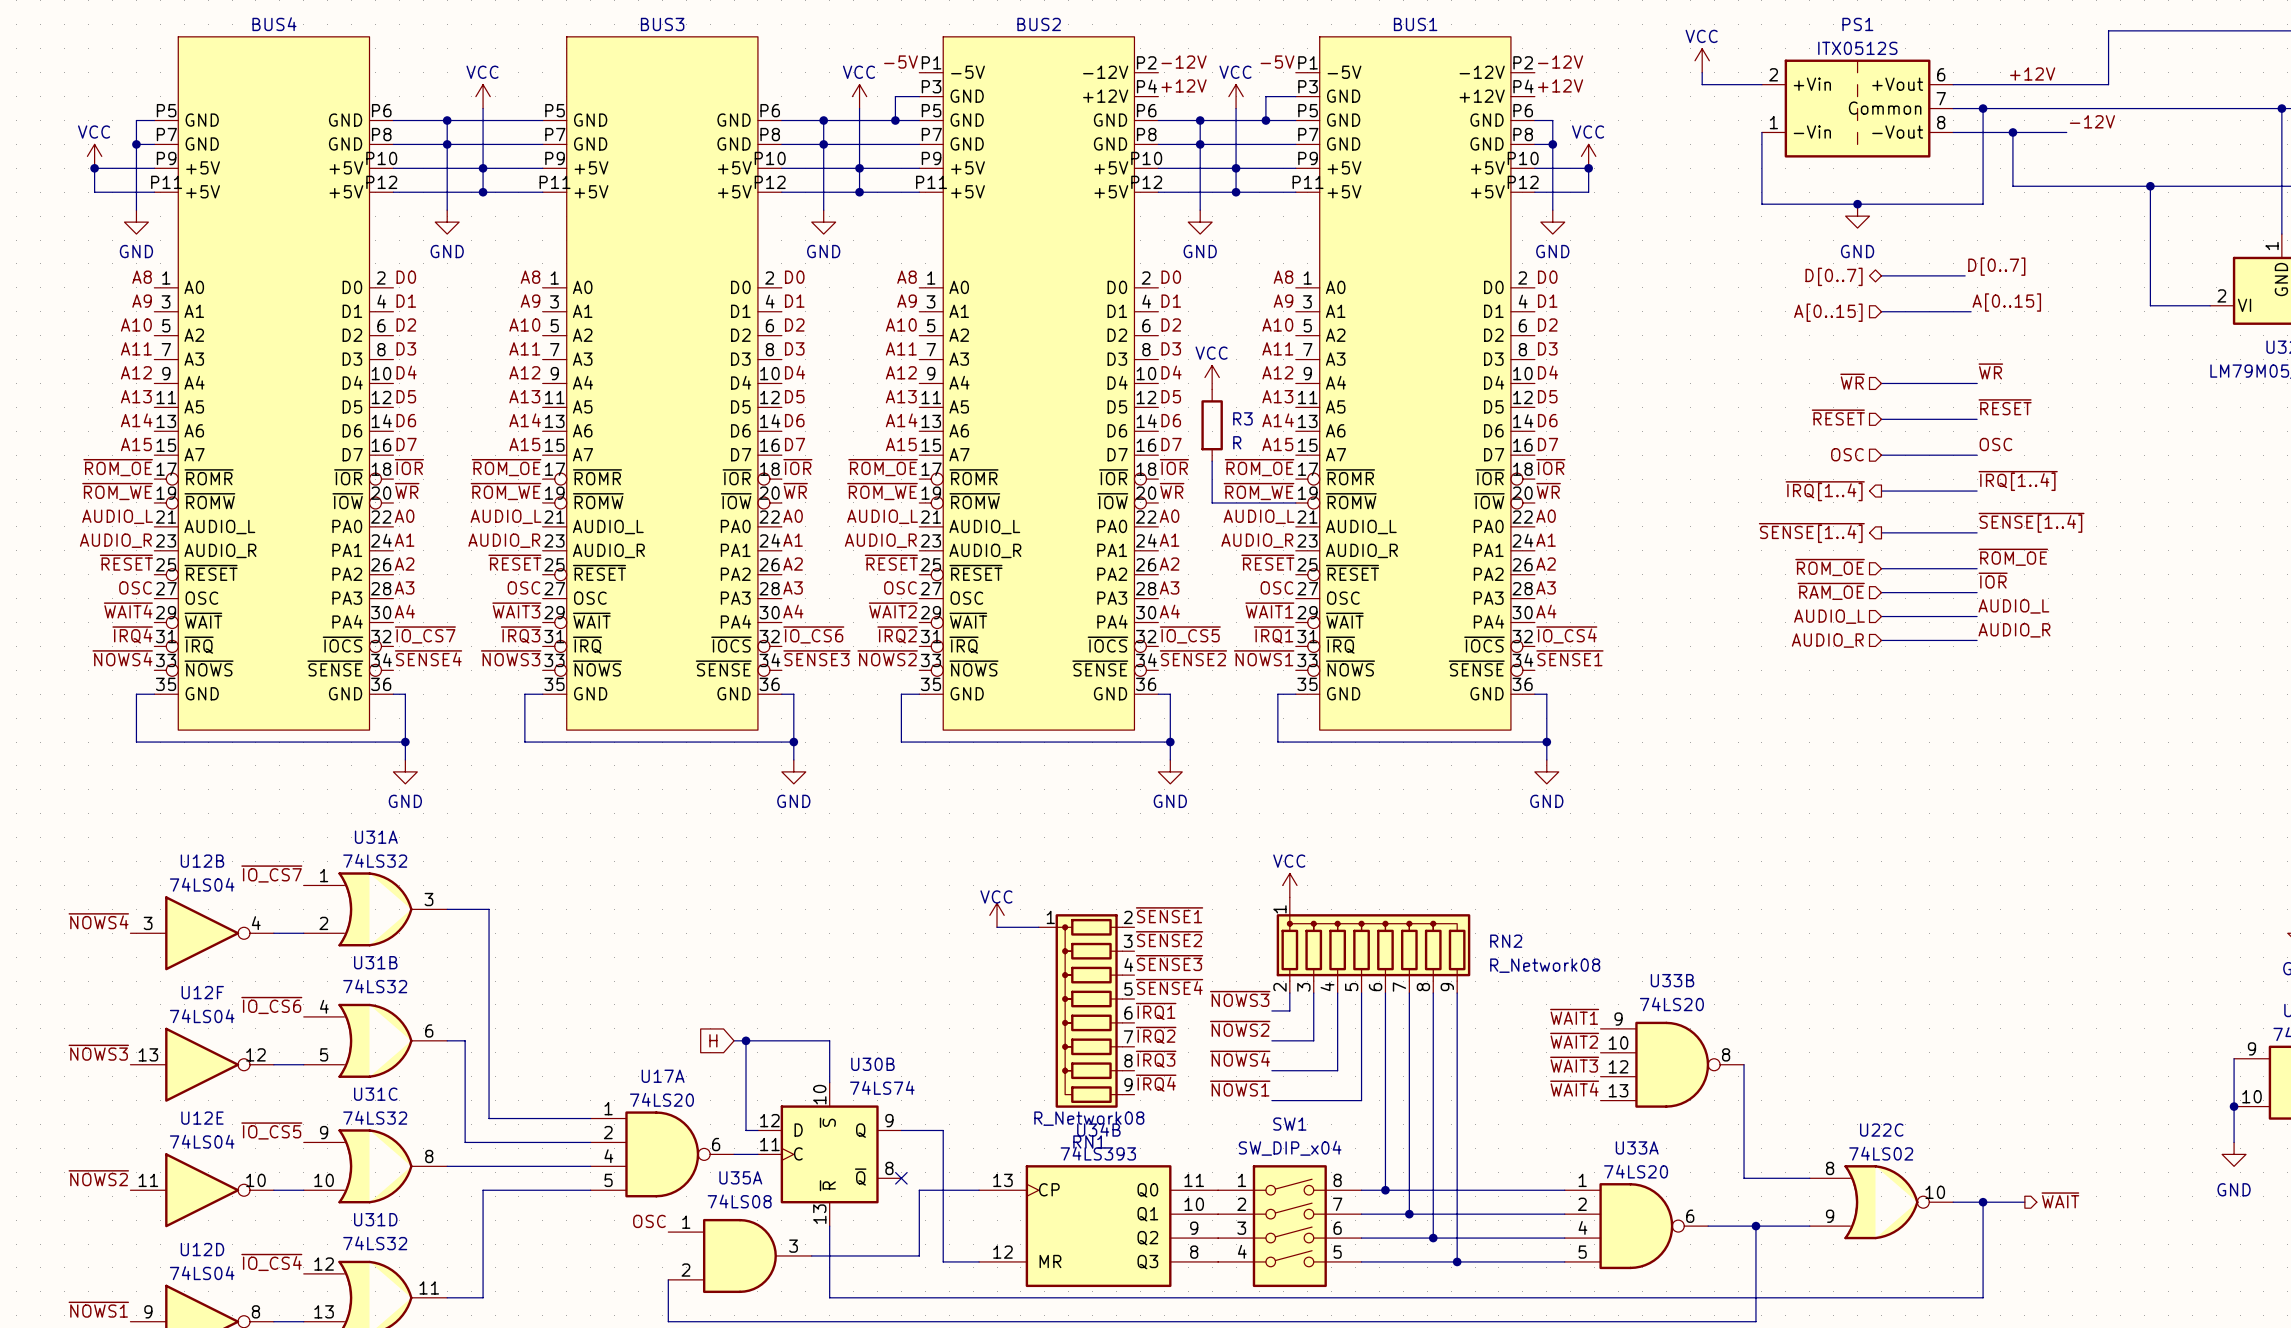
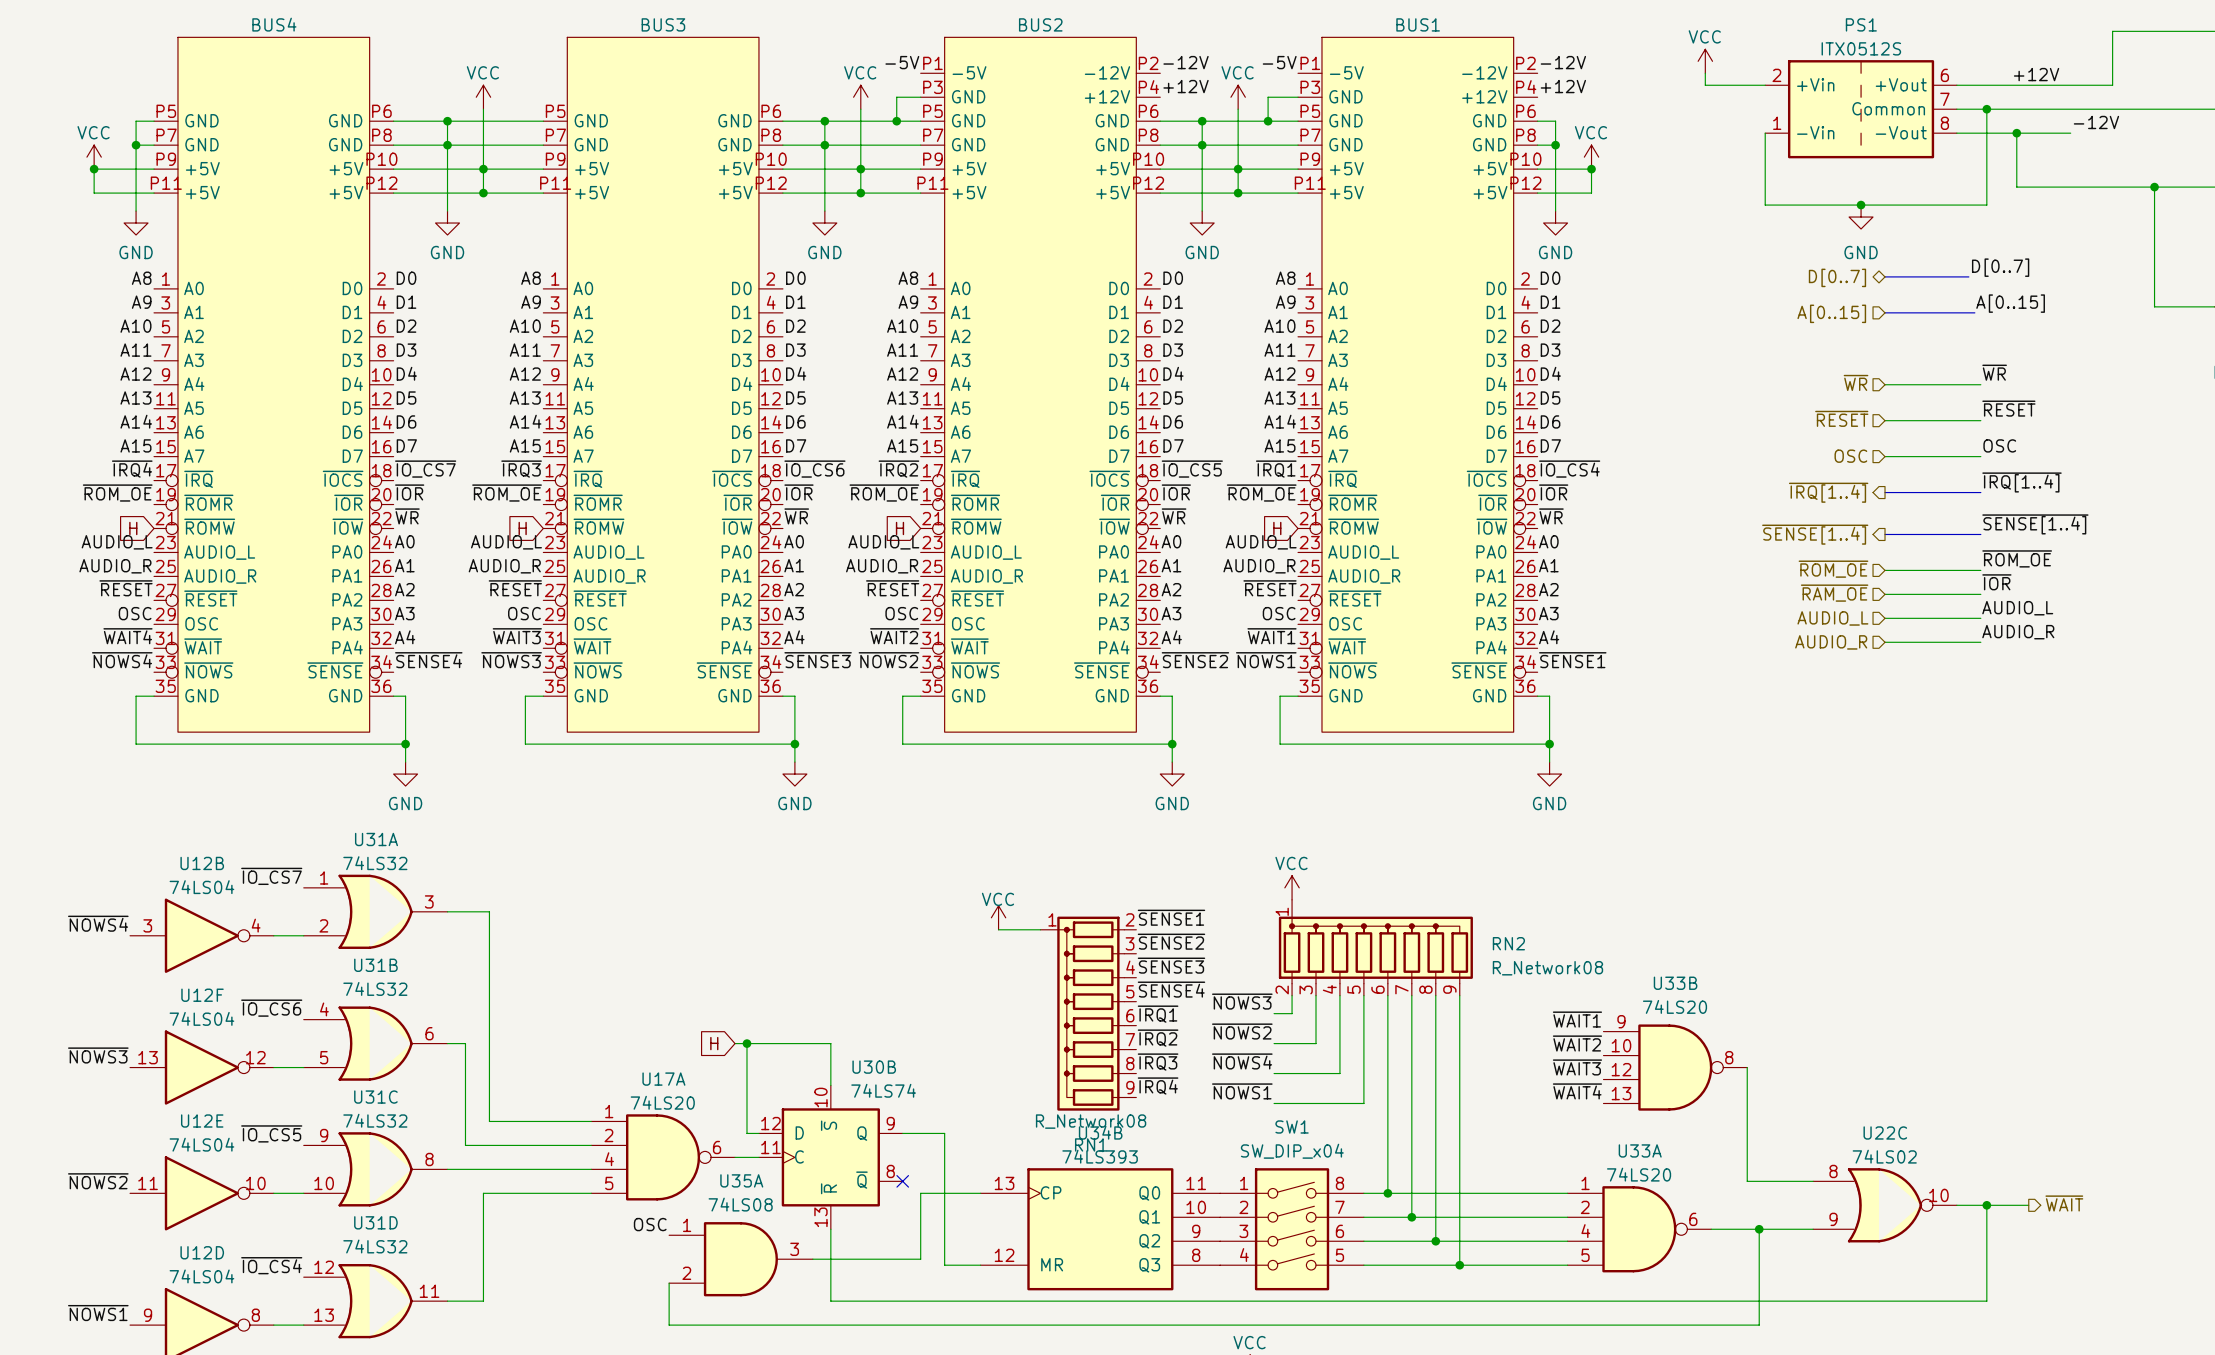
BUS4 symbol: [154, 36, 394, 731] -> [154, 37, 394, 733]
BUS3 symbol: [542, 36, 782, 731] -> [543, 37, 783, 733]
BUS2 symbol: [919, 36, 1159, 731] -> [920, 37, 1161, 733]
BUS1 symbol: [1295, 36, 1535, 731] -> [1298, 37, 1538, 733]
power symbol: VCC (1212, 377) -> none
R3: R (1212, 425) -> none
wire: (1212, 461) (1212, 502) (1295, 502) -> none
label: ~{ROM_OE} (118, 467) -> ~{IRQ4} (132, 469)
label: ~{IOR} (409, 467) -> ~{IO_CS7} (425, 469)
label: ~{ROM_OE} (506, 467) -> ~{IRQ3} (521, 469)
label: ~{IOR} (797, 467) -> ~{IO_CS6} (814, 469)
label: ~{ROM_OE} (883, 467) -> ~{IRQ2} (898, 469)
label: ~{IOR} (1174, 467) -> ~{IO_CS5} (1192, 469)
label: ~{ROM_OE} (1259, 467) -> ~{IRQ1} (1276, 469)
label: ~{IOR} (1550, 467) -> ~{IO_CS4} (1569, 469)
label: ~{WR} (407, 490) -> ~{IOR} (409, 492)
label: ~{WR} (795, 490) -> ~{IOR} (798, 492)
label: ~{WR} (1172, 490) -> ~{IOR} (1176, 492)
label: ~{WR} (1548, 490) -> ~{IOR} (1553, 492)
label: ~{ROM_WE} (117, 491) -> ~{ROM_OE} (117, 493)
label: ~{ROM_WE} (506, 491) -> ~{ROM_OE} (507, 493)
label: ~{ROM_WE} (882, 491) -> ~{ROM_OE} (884, 493)
label: ~{ROM_WE} (1259, 491) -> ~{ROM_OE} (1261, 493)
label: AUDIO_L (117, 516) -> none
label: A0 (404, 516) -> ~{WR} (407, 516)
label: AUDIO_L (506, 516) -> none
label: A0 (793, 516) -> ~{WR} (796, 516)
label: AUDIO_L (882, 516) -> none
label: A0 (1169, 516) -> ~{WR} (1174, 516)
label: AUDIO_L (1259, 516) -> none
label: A0 (1546, 516) -> ~{WR} (1551, 516)
global label: none -> H (133, 528)
global label: none -> H (522, 528)
global label: none -> H (899, 528)
global label: none -> H (1277, 528)
label: AUDIO_R (115, 540) -> AUDIO_L (117, 542)
label: A1 (404, 540) -> A0 (404, 541)
label: AUDIO_R (504, 540) -> AUDIO_L (506, 542)
label: A1 (793, 540) -> A0 (794, 541)
label: AUDIO_R (880, 540) -> AUDIO_L (883, 542)
label: A1 (1169, 540) -> A0 (1171, 541)
label: AUDIO_R (1257, 540) -> AUDIO_L (1261, 542)
label: A1 (1546, 540) -> A0 (1548, 541)
label: ~{RESET} (126, 562) -> AUDIO_R (115, 566)
label: ~{RESET} (514, 562) -> AUDIO_R (504, 566)
label: ~{RESET} (891, 562) -> AUDIO_R (882, 566)
label: ~{RESET} (1267, 562) -> AUDIO_R (1259, 566)
label: A2 (404, 564) -> A1 (404, 565)
label: A2 (793, 564) -> A1 (794, 565)
label: A2 (1169, 564) -> A1 (1171, 565)
label: A2 (1546, 564) -> A1 (1548, 565)
label: OSC (135, 587) -> ~{RESET} (126, 588)
label: A3 (404, 587) -> A2 (404, 589)
label: OSC (523, 587) -> ~{RESET} (515, 588)
label: A3 (793, 587) -> A2 (794, 589)
label: OSC (900, 587) -> ~{RESET} (892, 588)
label: A3 (1169, 587) -> A2 (1171, 589)
label: OSC (1276, 587) -> ~{RESET} (1270, 588)
label: A3 (1546, 587) -> A2 (1548, 589)
label: ~{WAIT4} (128, 610) -> OSC (135, 613)
label: ~{WAIT3} (516, 610) -> OSC (524, 613)
label: ~{WAIT2} (893, 610) -> OSC (901, 613)
label: ~{WAIT1} (1269, 610) -> OSC (1279, 613)
label: A4 (404, 611) -> A3 (404, 613)
label: A4 (793, 611) -> A3 (794, 613)
label: A4 (1169, 611) -> A3 (1171, 613)
label: A4 (1546, 611) -> A3 (1548, 613)
label: ~{IRQ4} (132, 634) -> ~{WAIT4} (127, 636)
label: ~{IO_CS7} (425, 634) -> A4 (405, 637)
label: ~{IRQ3} (521, 634) -> ~{WAIT3} (517, 636)
label: ~{IO_CS6} (813, 634) -> A4 (794, 637)
label: ~{IRQ2} (897, 634) -> ~{WAIT2} (894, 636)
label: ~{IO_CS5} (1190, 634) -> A4 (1171, 637)
label: ~{IRQ1} (1274, 634) -> ~{WAIT1} (1271, 636)
label: ~{IO_CS4} (1566, 634) -> A4 (1549, 637)

